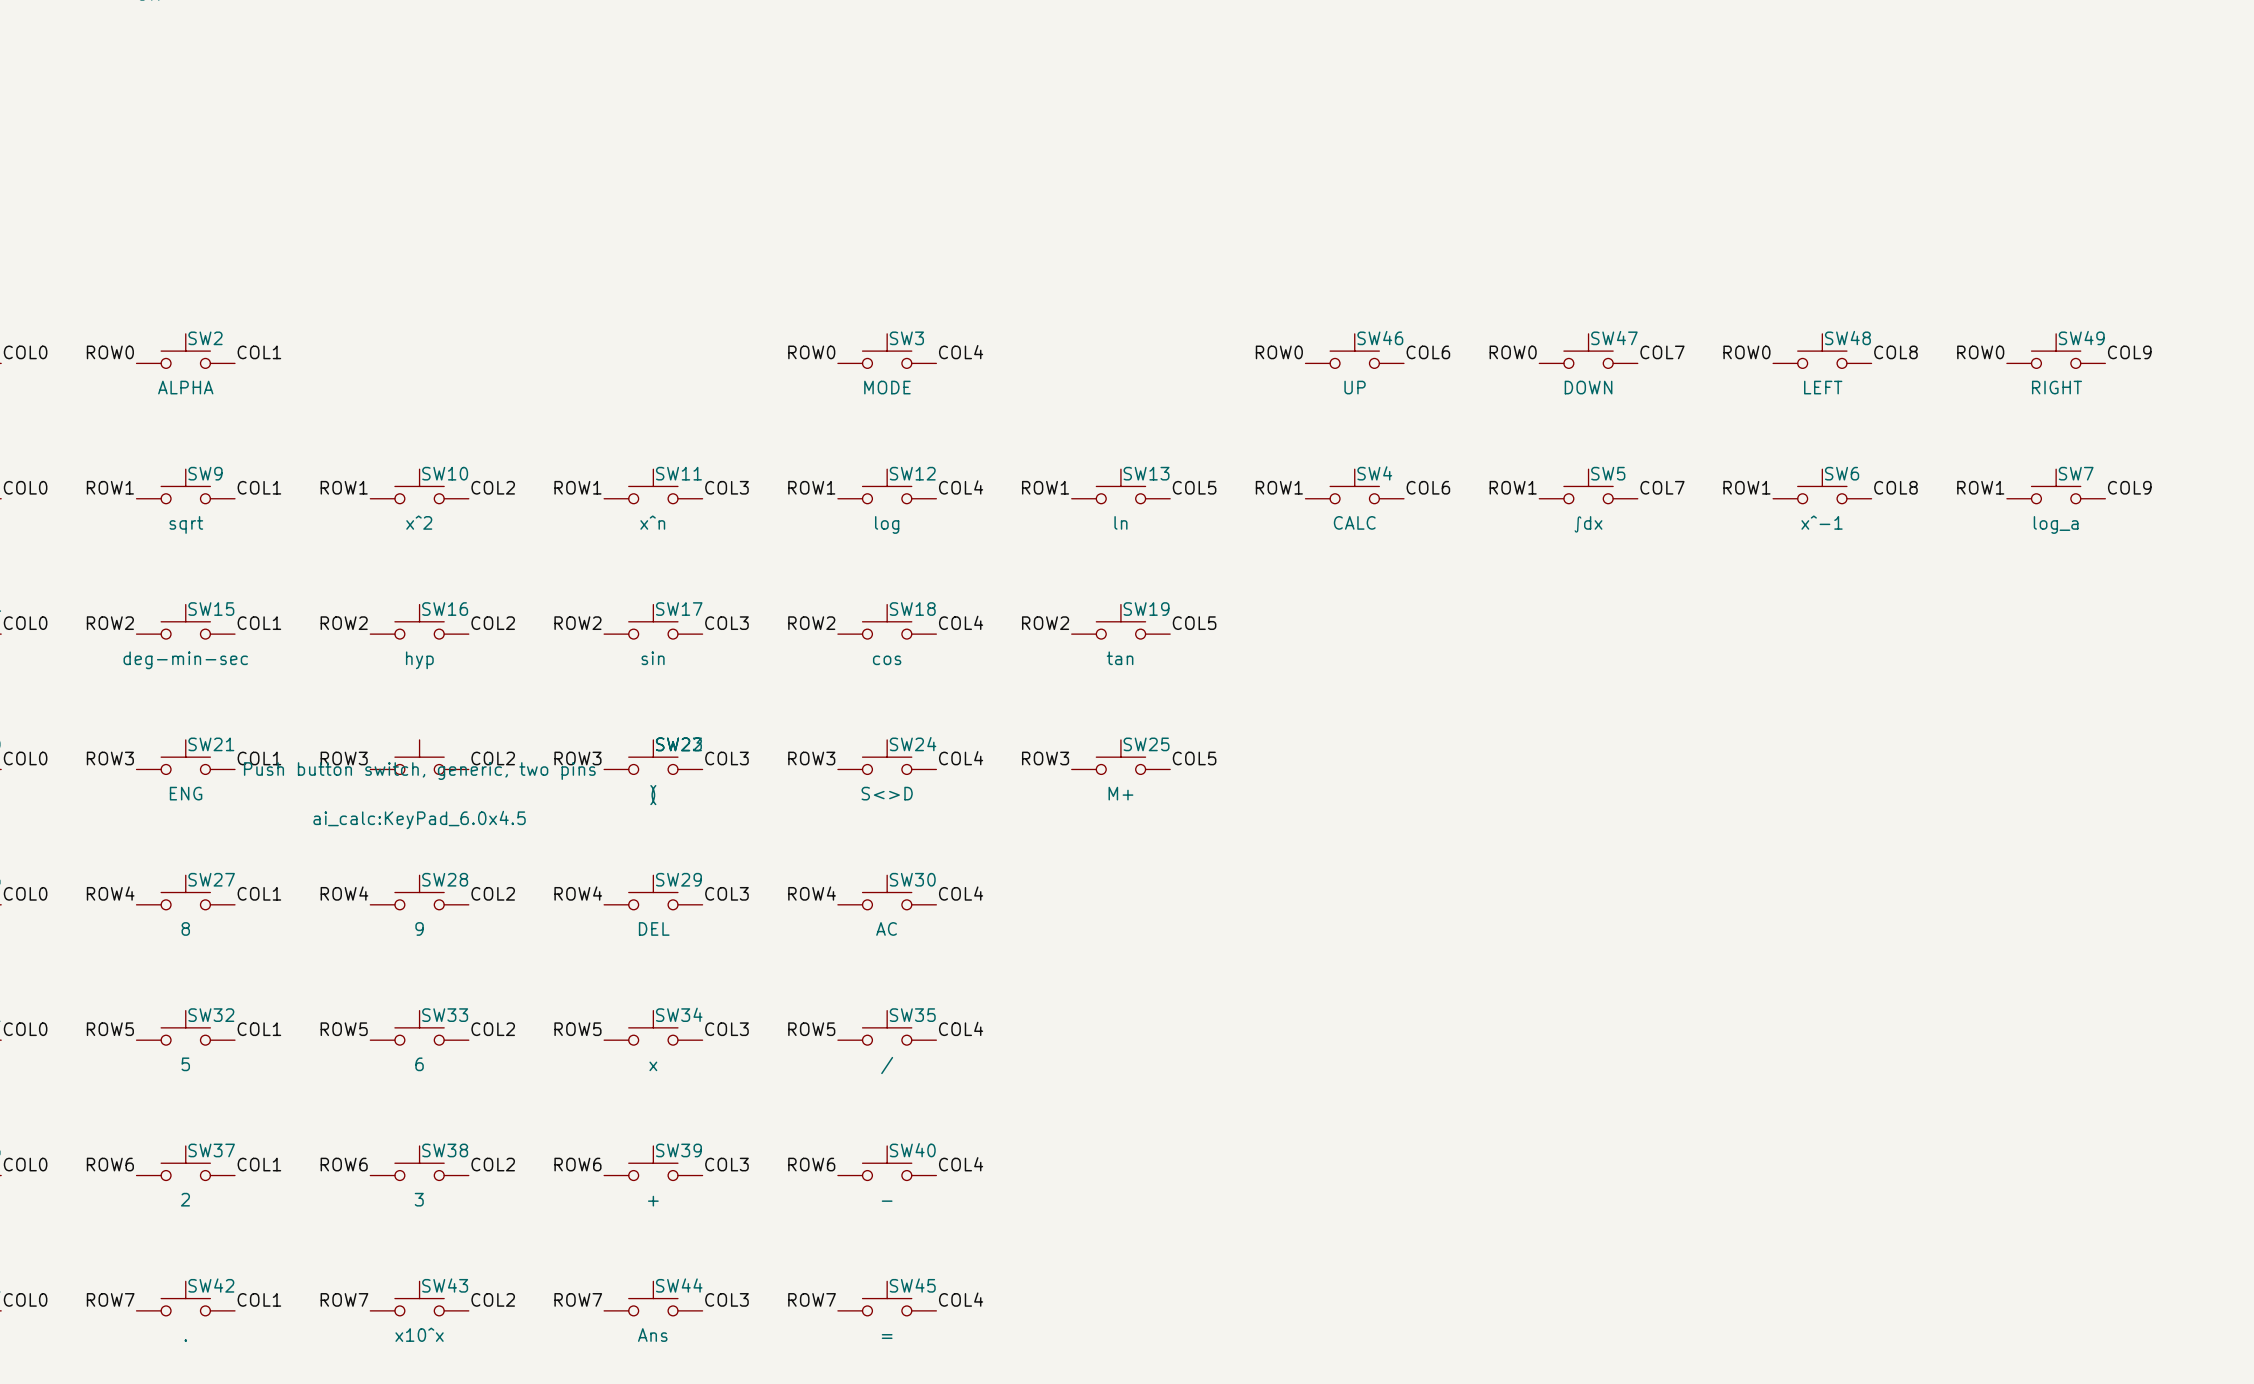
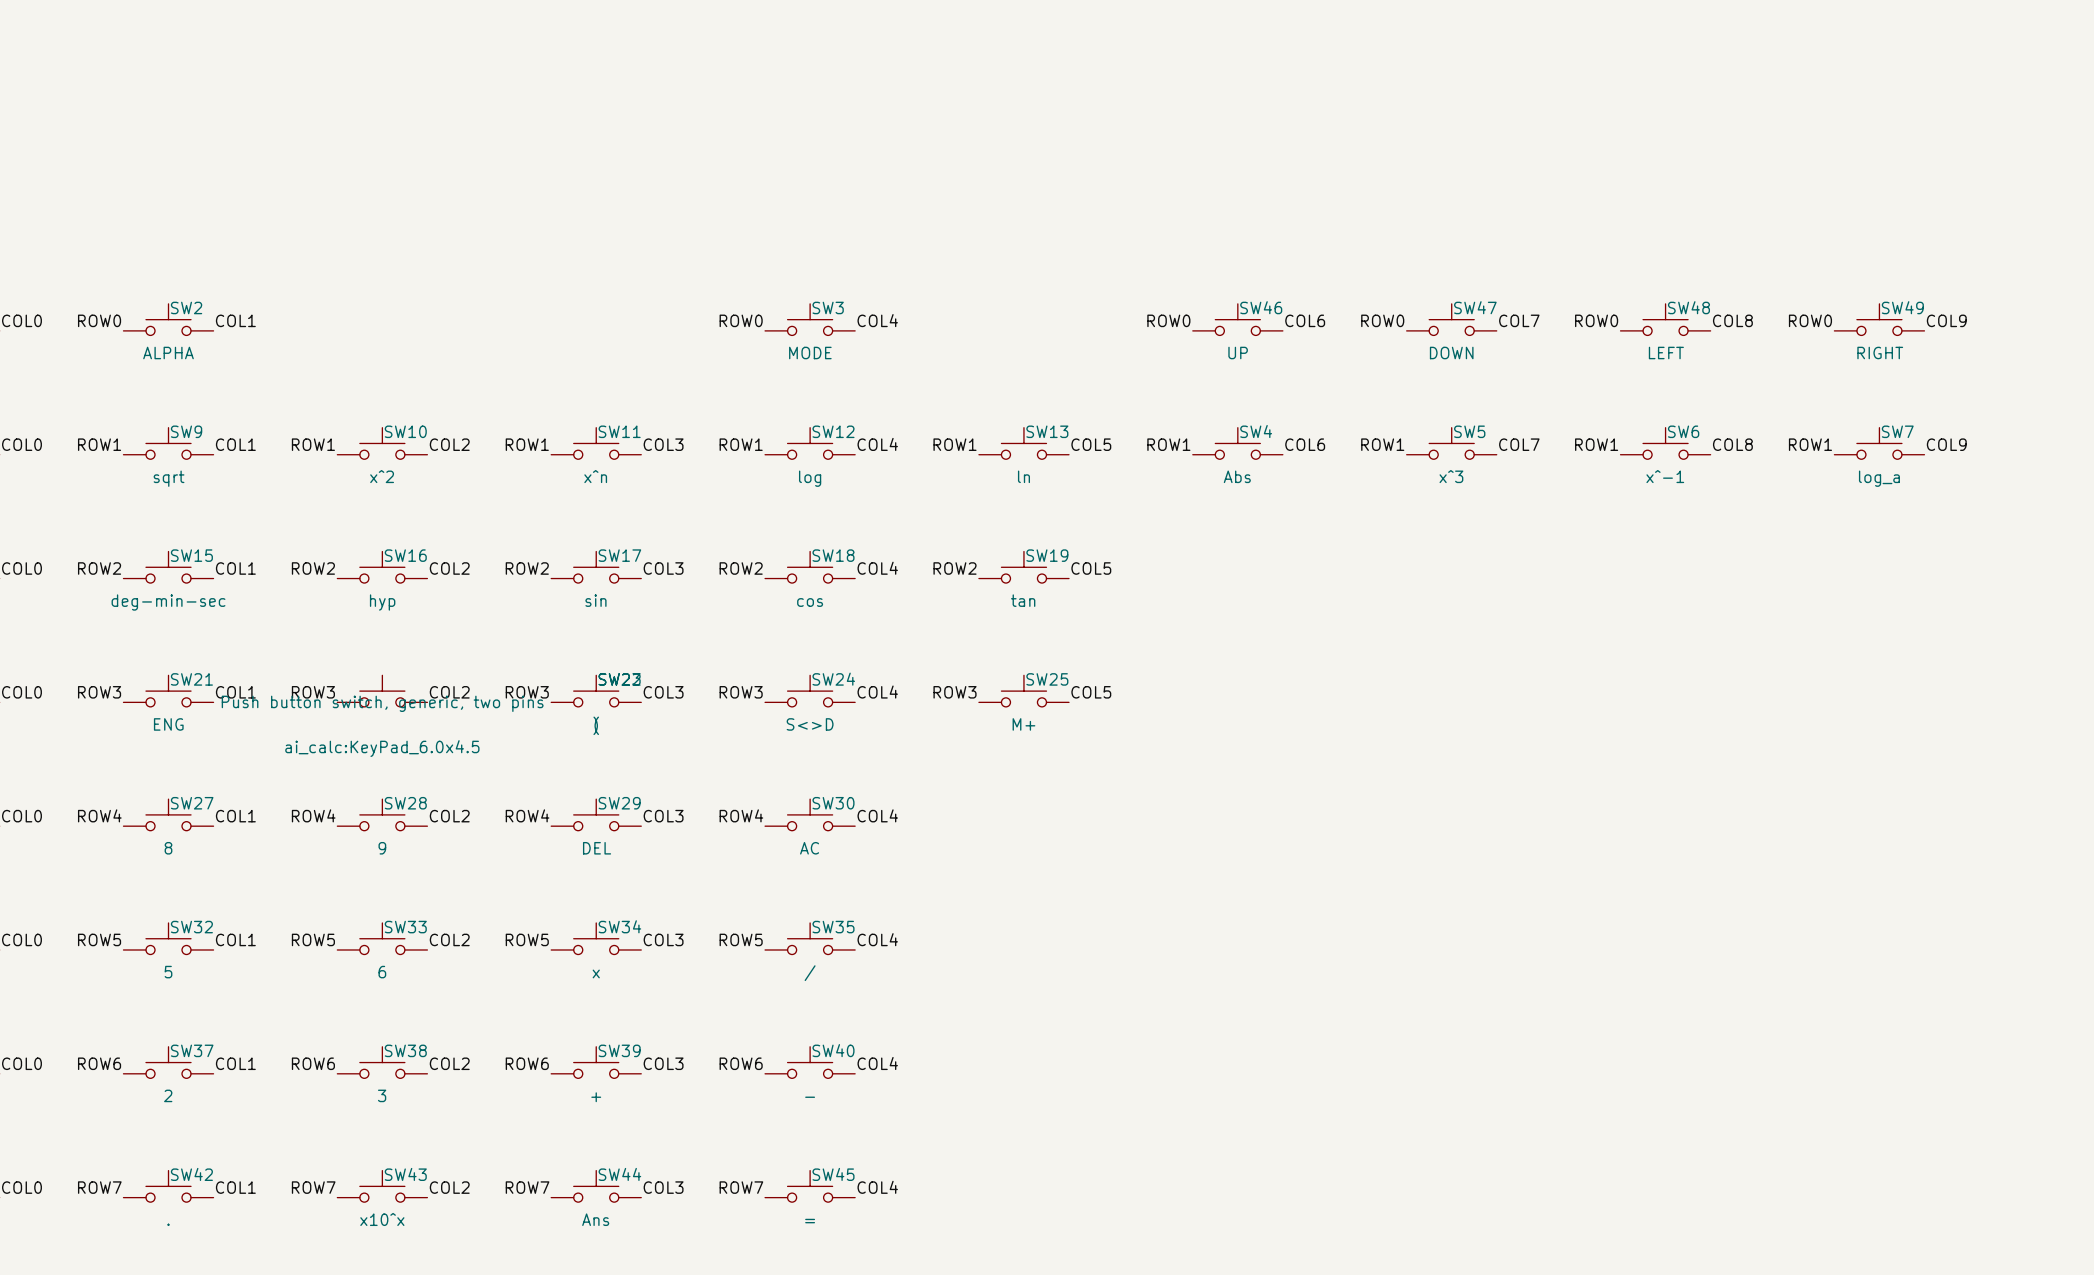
SW4 value: CALC (1354, 522) -> Abs (1237, 476)
SW5 value: ∫dx (1588, 524) -> x^3 (1451, 476)

